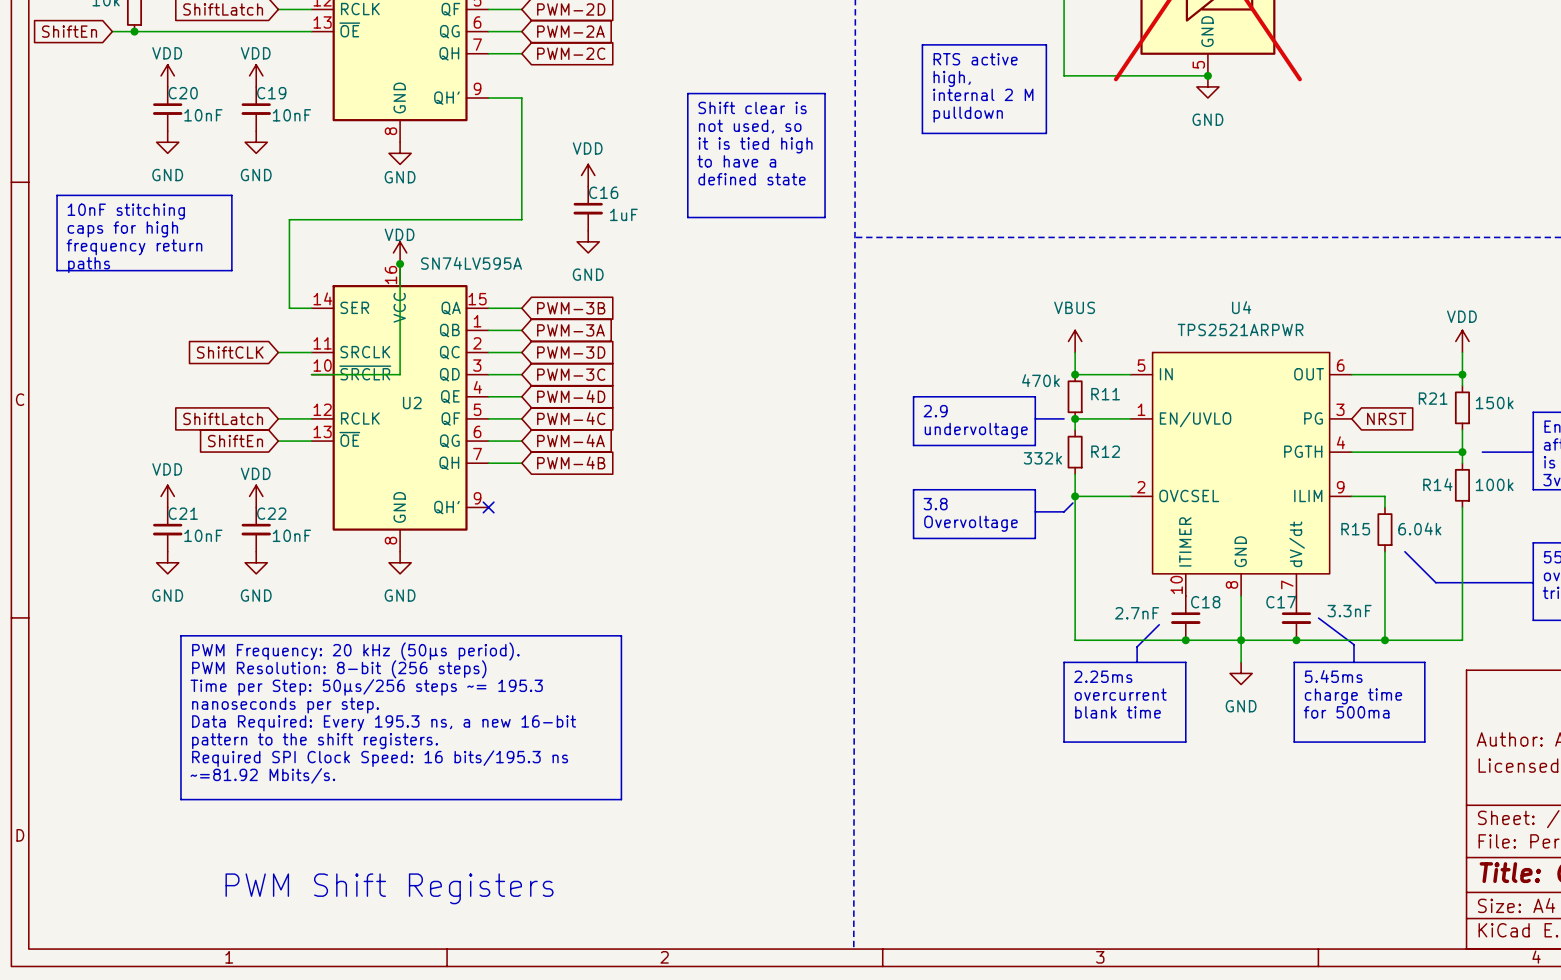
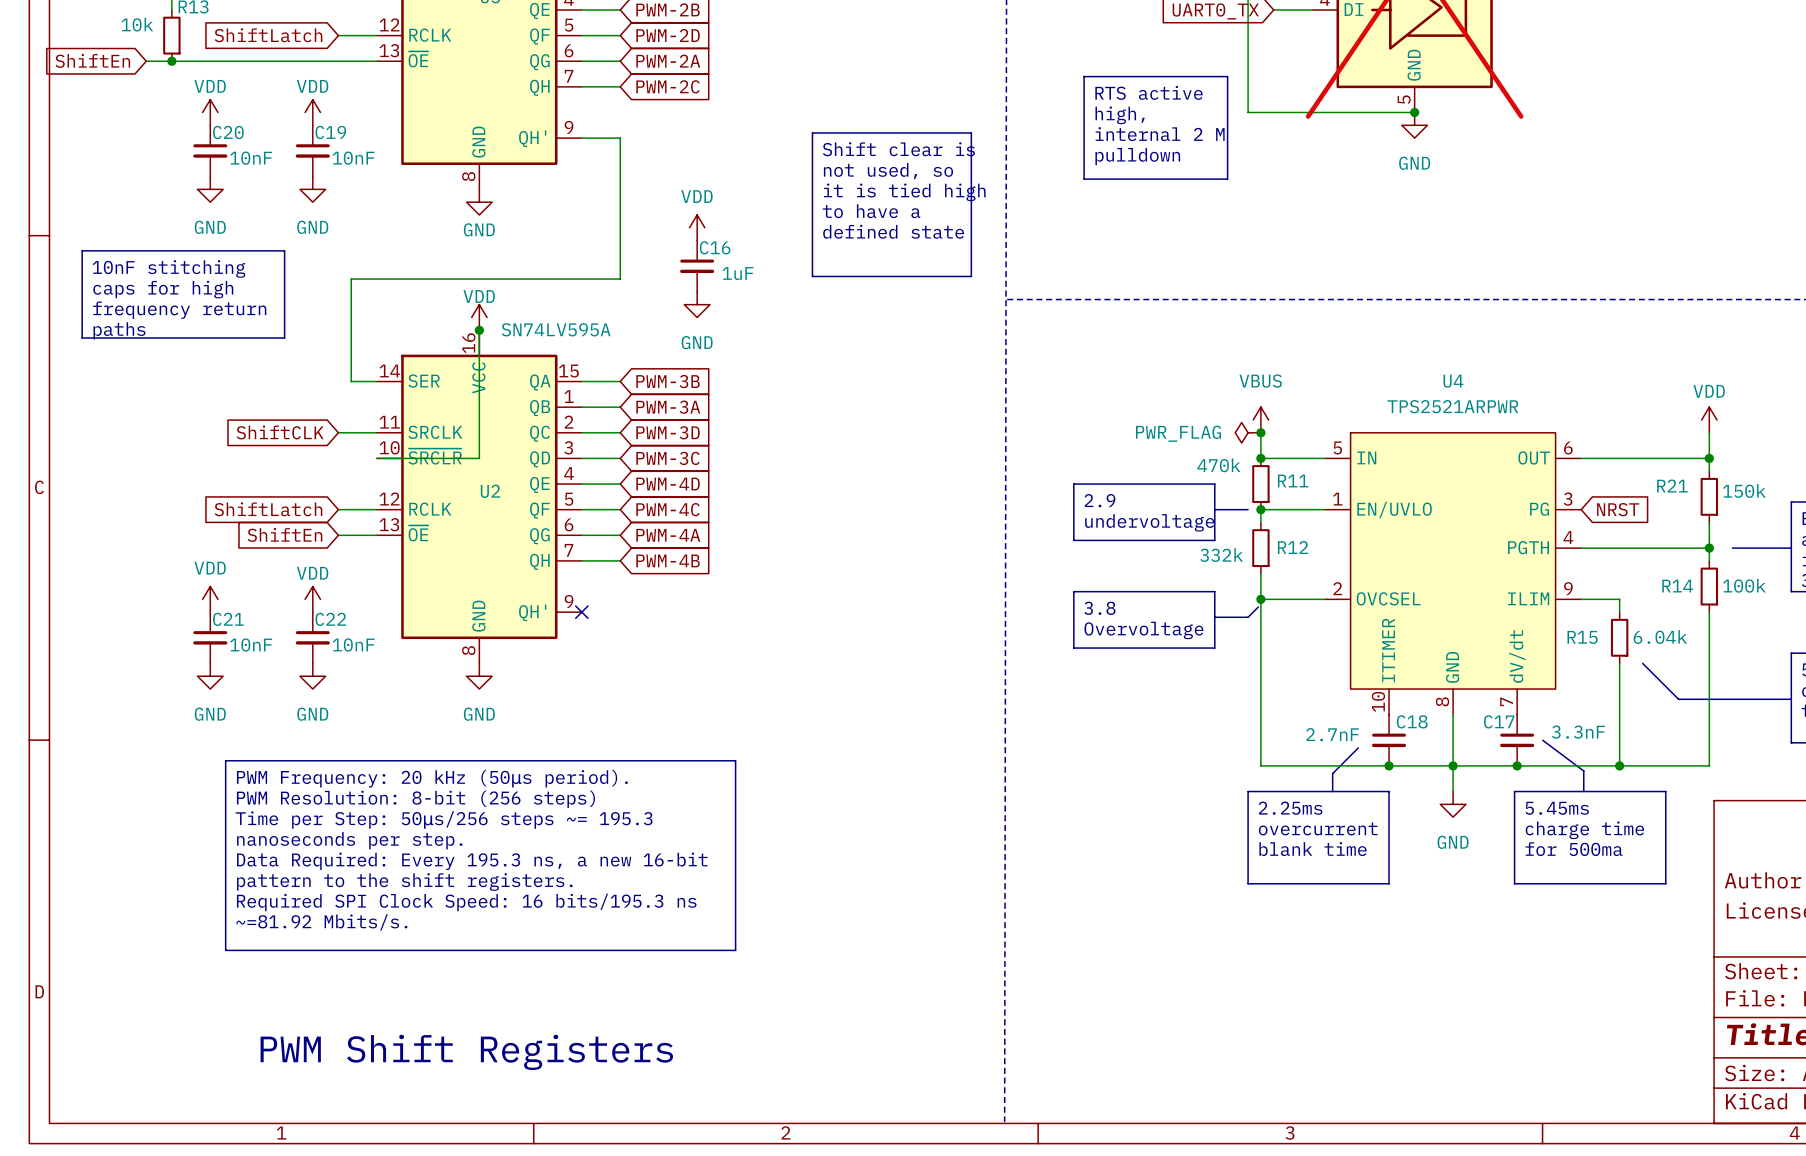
power symbol: none -> PWR_FLAG (1248, 432)
junction: none -> (1260, 432)

